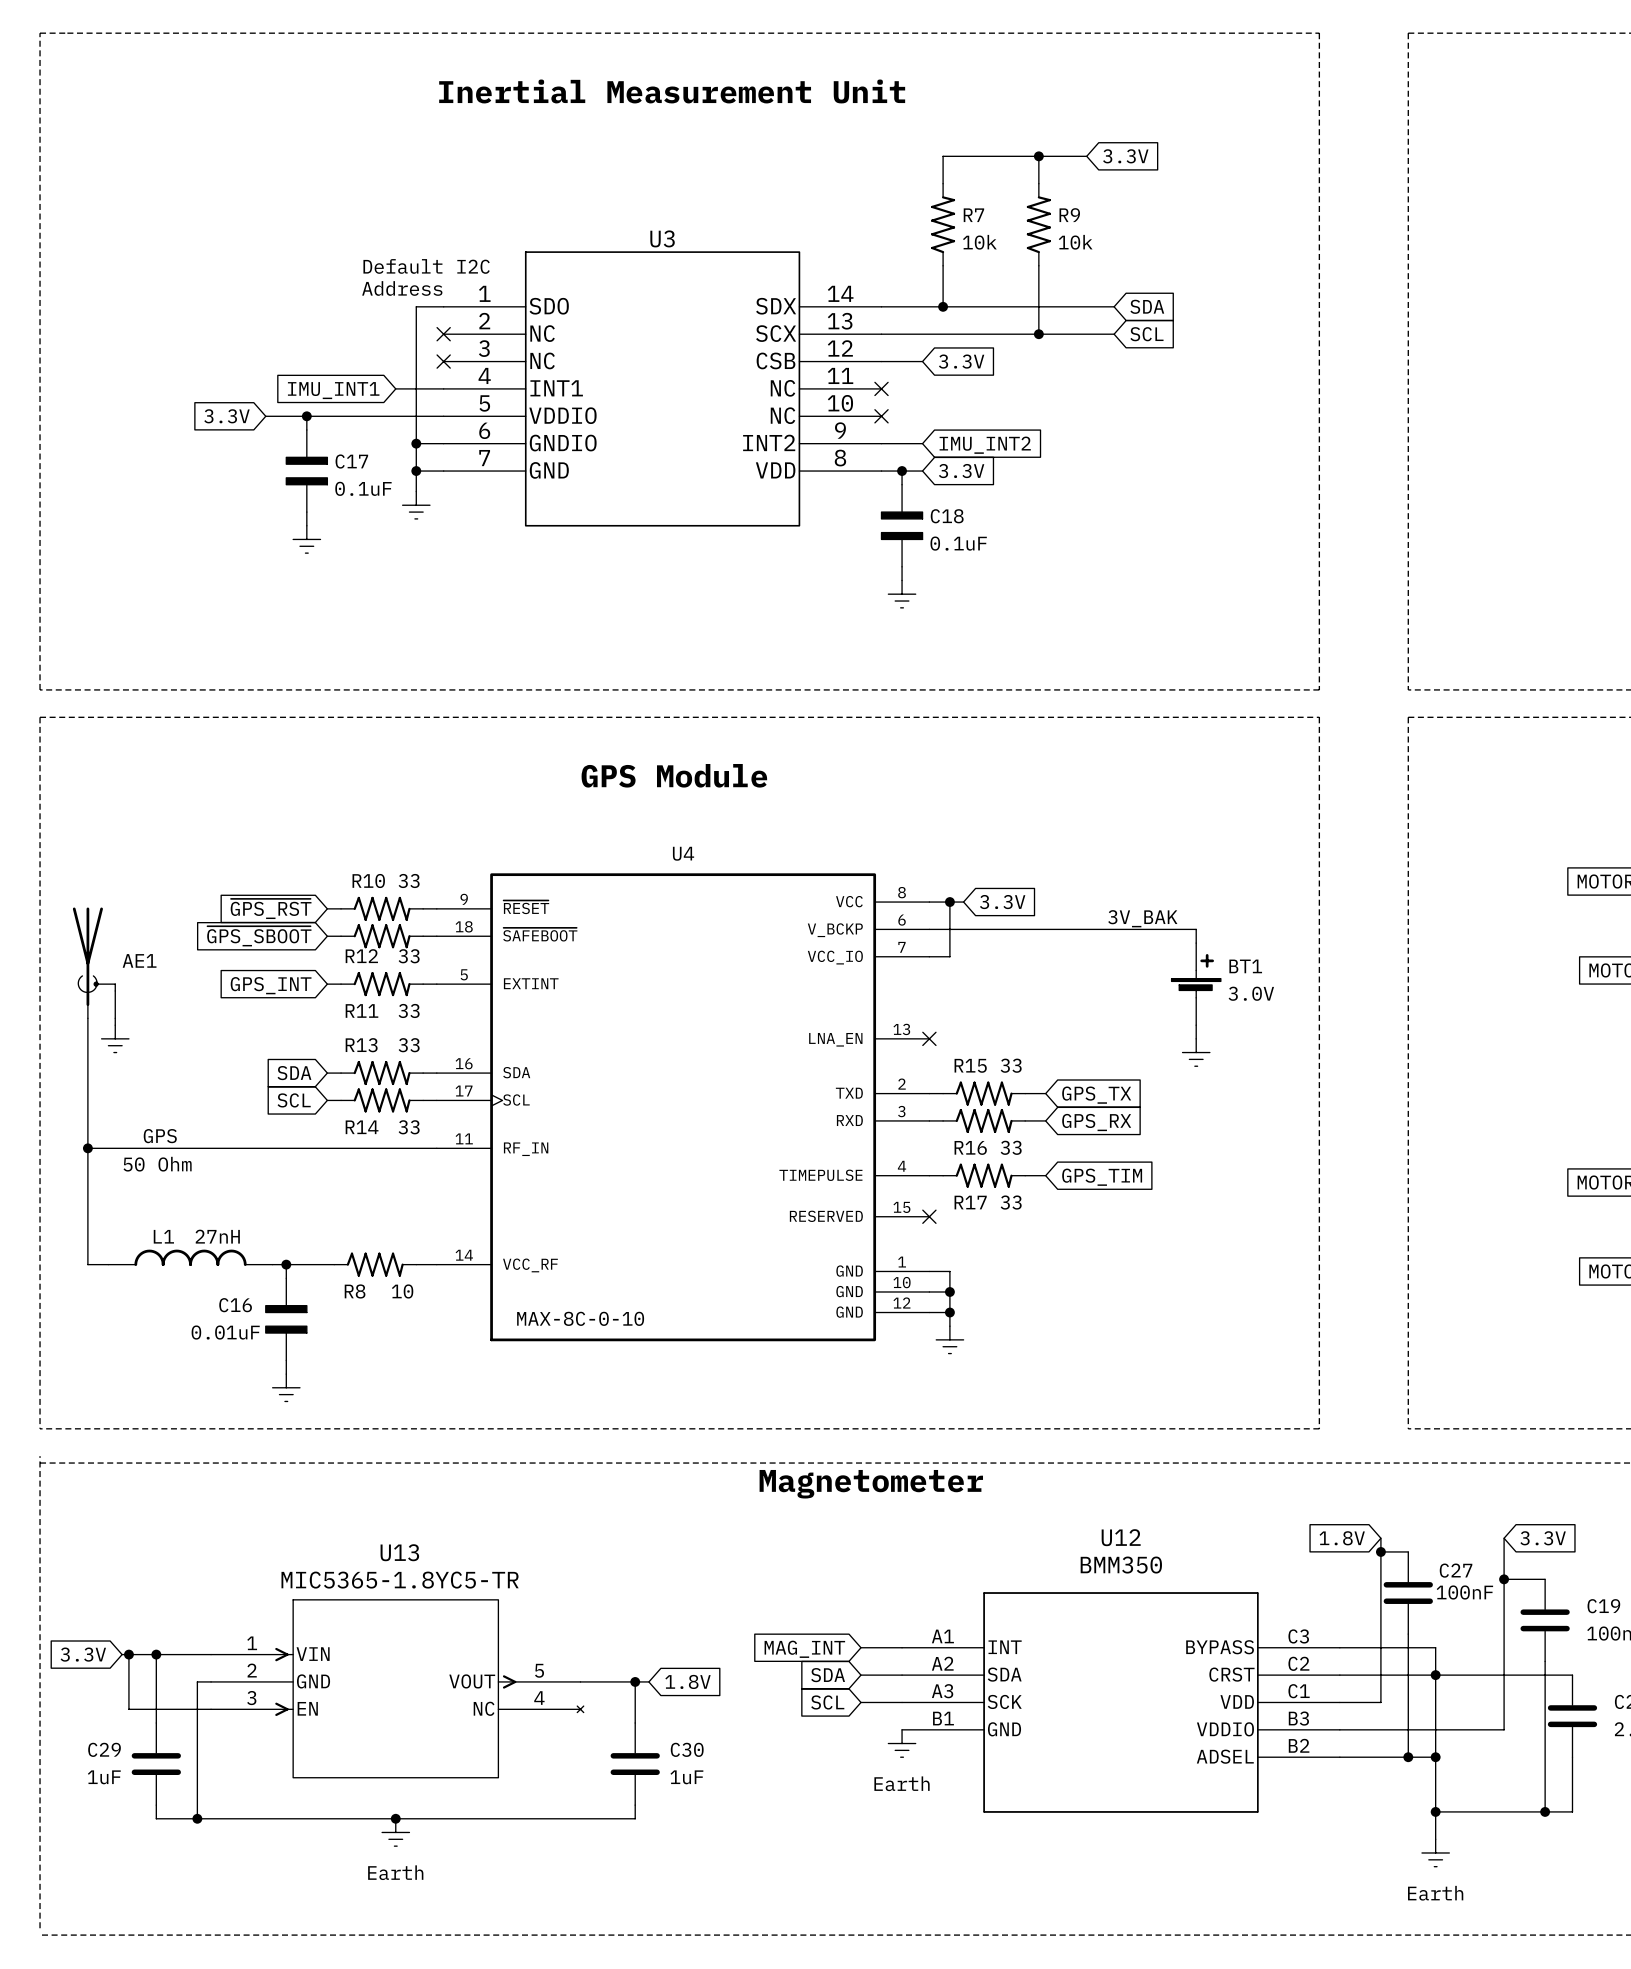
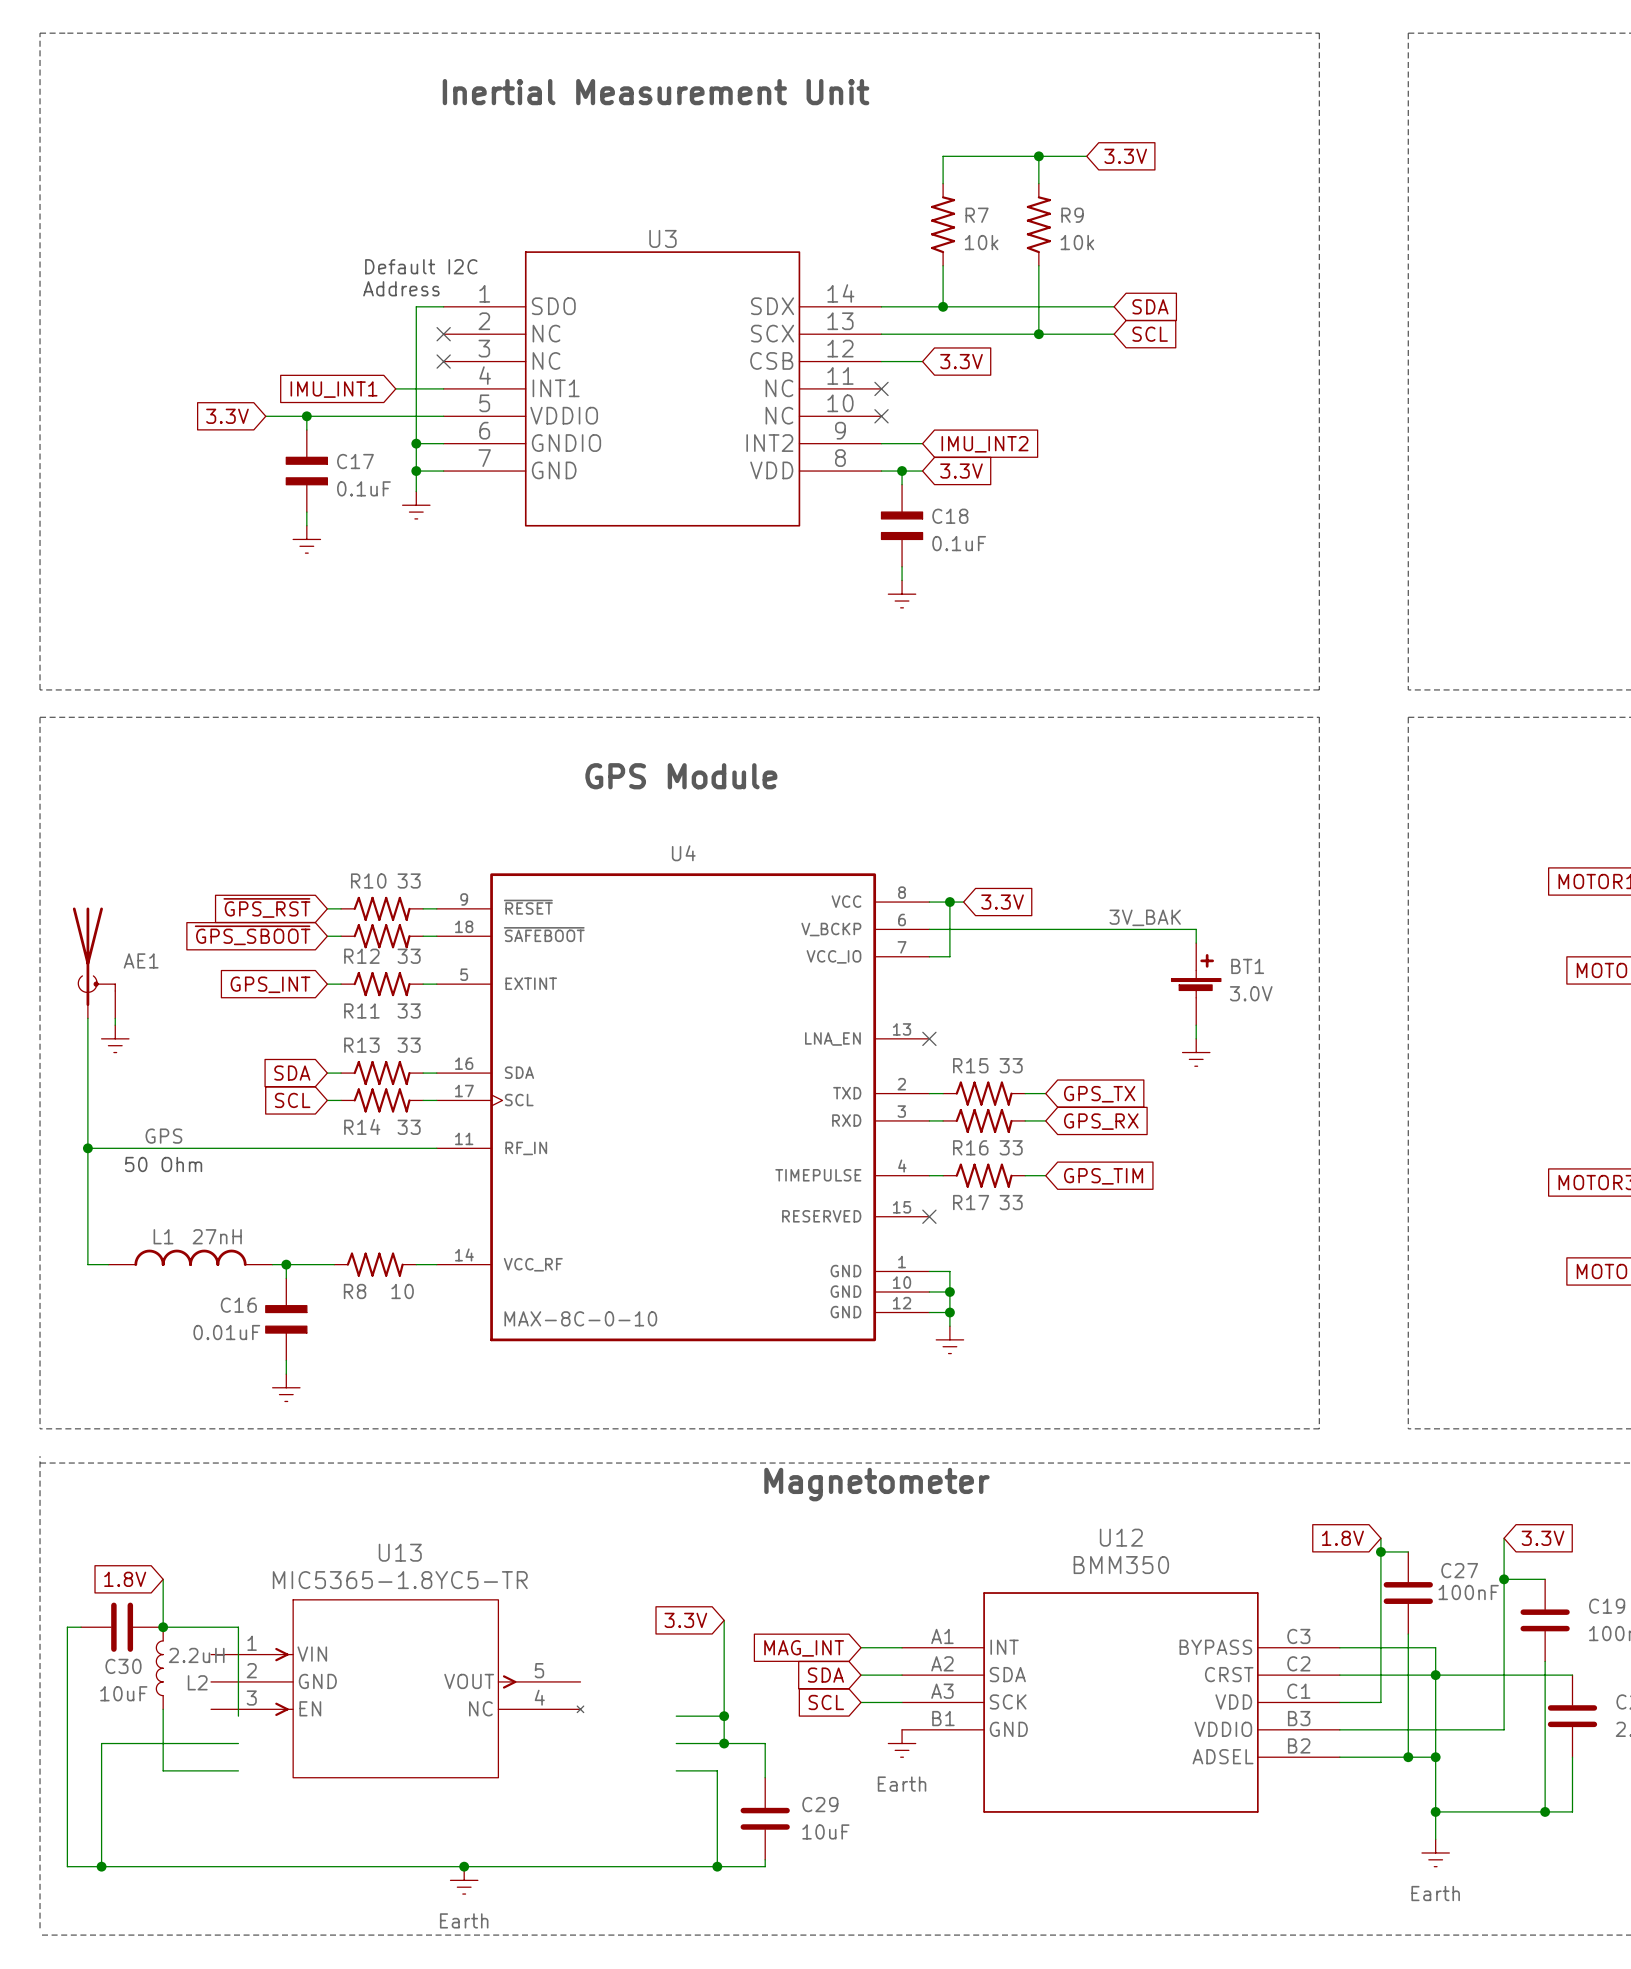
global label: none -> 1.8V (125, 1579)
wire: none -> (163, 1579) (163, 1627) (238, 1627) (238, 1716)
global label: none -> 3.3V (685, 1620)
wire: none -> (724, 1620) (724, 1743)
wire: none -> (81, 1627) (67, 1627) (67, 1866) (765, 1866) (765, 1859)
junction: none -> (163, 1627)
global label: 3.3V (83, 1654) -> none
wire: (122, 1654) (211, 1654) -> none
wire: (128, 1654) (128, 1709) (211, 1709) -> none
junction: (128, 1654) -> none
wire: (156, 1654) (156, 1723) -> none
junction: (156, 1654) -> none
L2: none -> 2.2uH (159, 1668)
wire: (211, 1681) (197, 1681) (197, 1818) -> none
wire: (580, 1681) (648, 1681) -> none
wire: (635, 1681) (635, 1723) -> none
junction: (635, 1681) -> none
global label: 1.8V (687, 1681) -> none
wire: none -> (163, 1709) (163, 1770) (238, 1770)
wire: none -> (676, 1716) (724, 1716)
junction: none -> (724, 1716)
wire: none -> (238, 1743) (101, 1743) (101, 1866)
wire: none -> (676, 1743) (765, 1743) (765, 1777)
junction: none -> (724, 1743)
C29 name position: C29 (104, 1749) -> C29 (820, 1804)
C30 name position: C30 (687, 1749) -> C30 (123, 1666)
C29 position: (156, 1764) -> (765, 1818)
C30 rotation: 0° (635, 1764) -> 90° clockwise (122, 1627)
C30 position: (635, 1764) -> (122, 1627)
wire: none -> (676, 1770) (717, 1770) (717, 1866)
C29 value: 1uF (104, 1777) -> 10uF (825, 1831)
C30 value: 1uF (686, 1777) -> 10uF (123, 1693)
wire: (156, 1805) (156, 1818) (635, 1818) (635, 1805) -> none
junction: (197, 1818) -> none
junction: (395, 1818) -> none
power symbol position: Earth (395, 1832) -> Earth (464, 1880)
junction: none -> (101, 1866)
junction: none -> (464, 1866)
junction: none -> (717, 1866)

